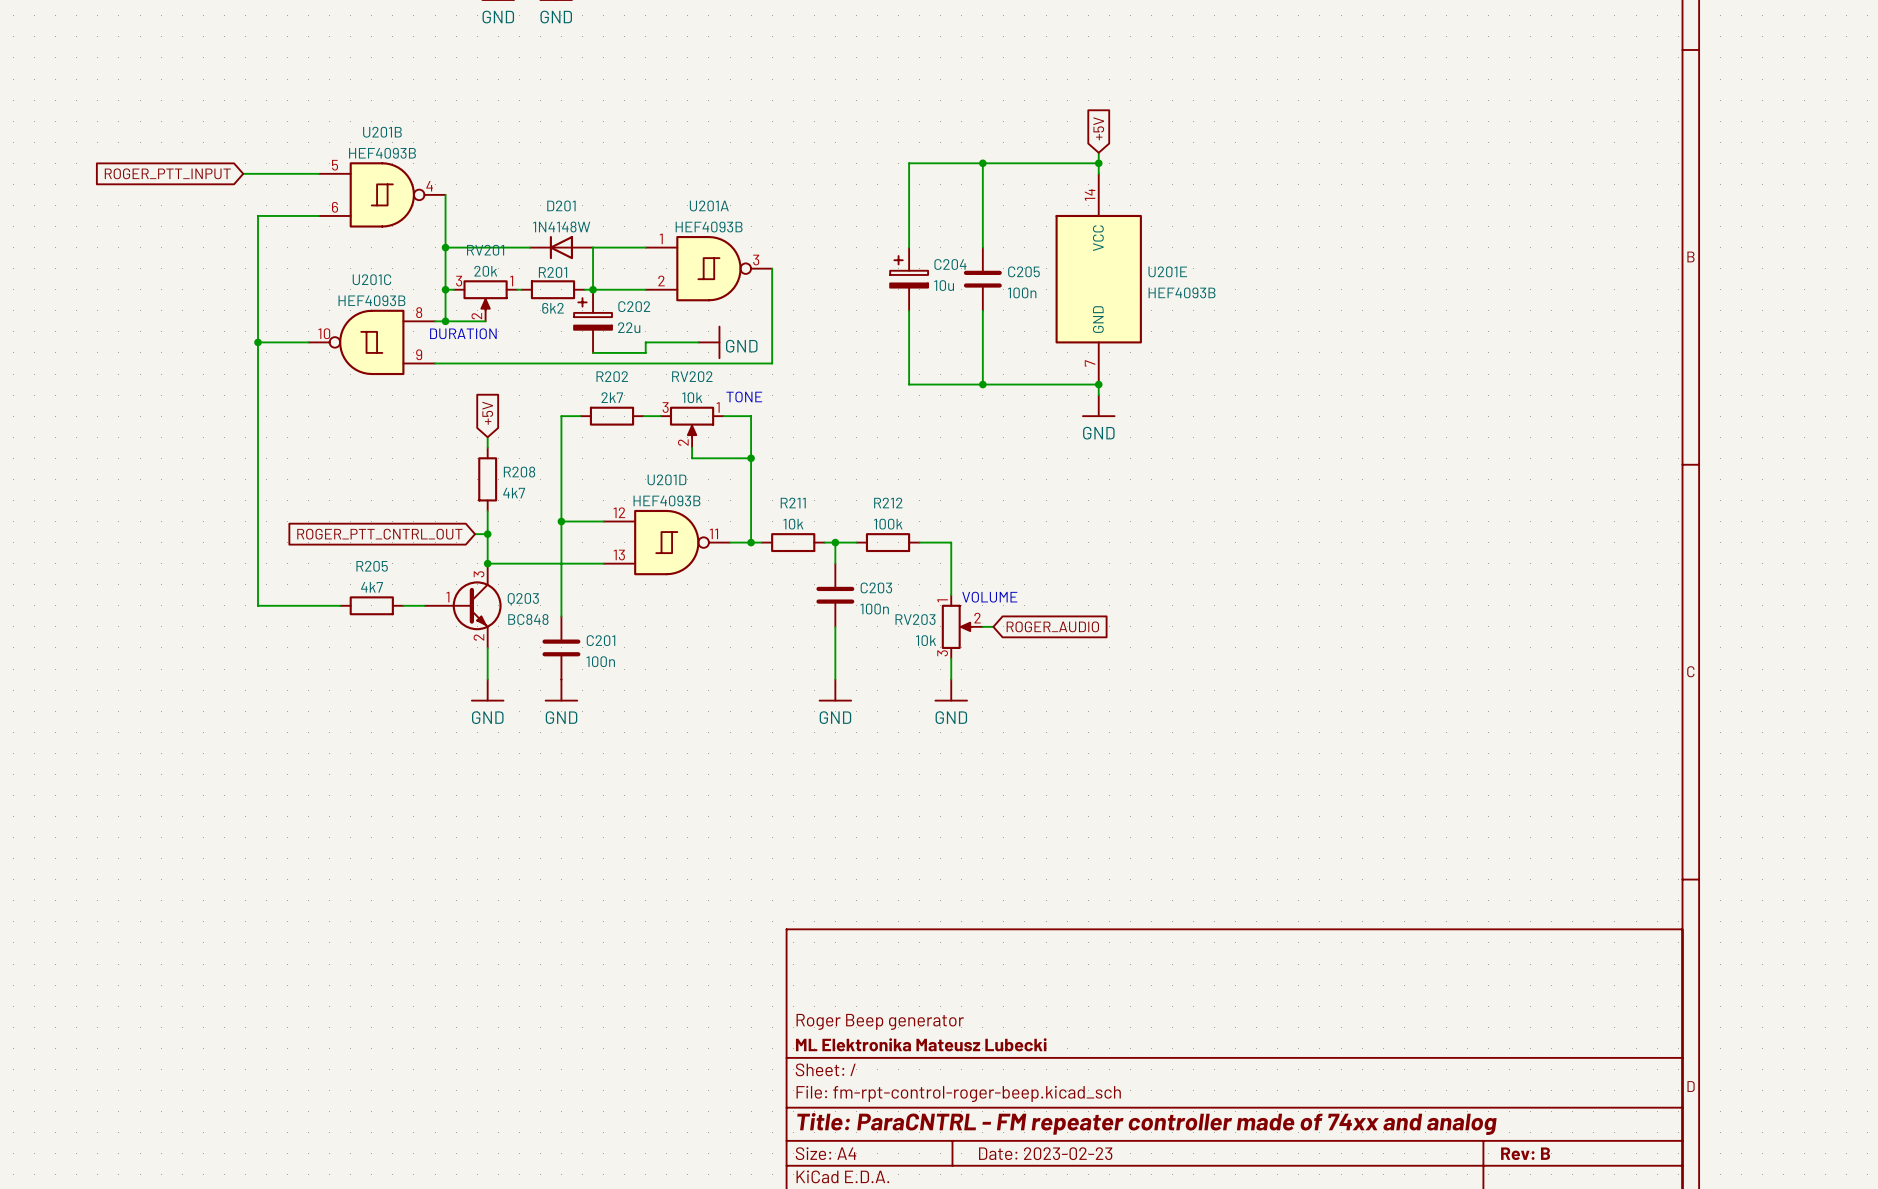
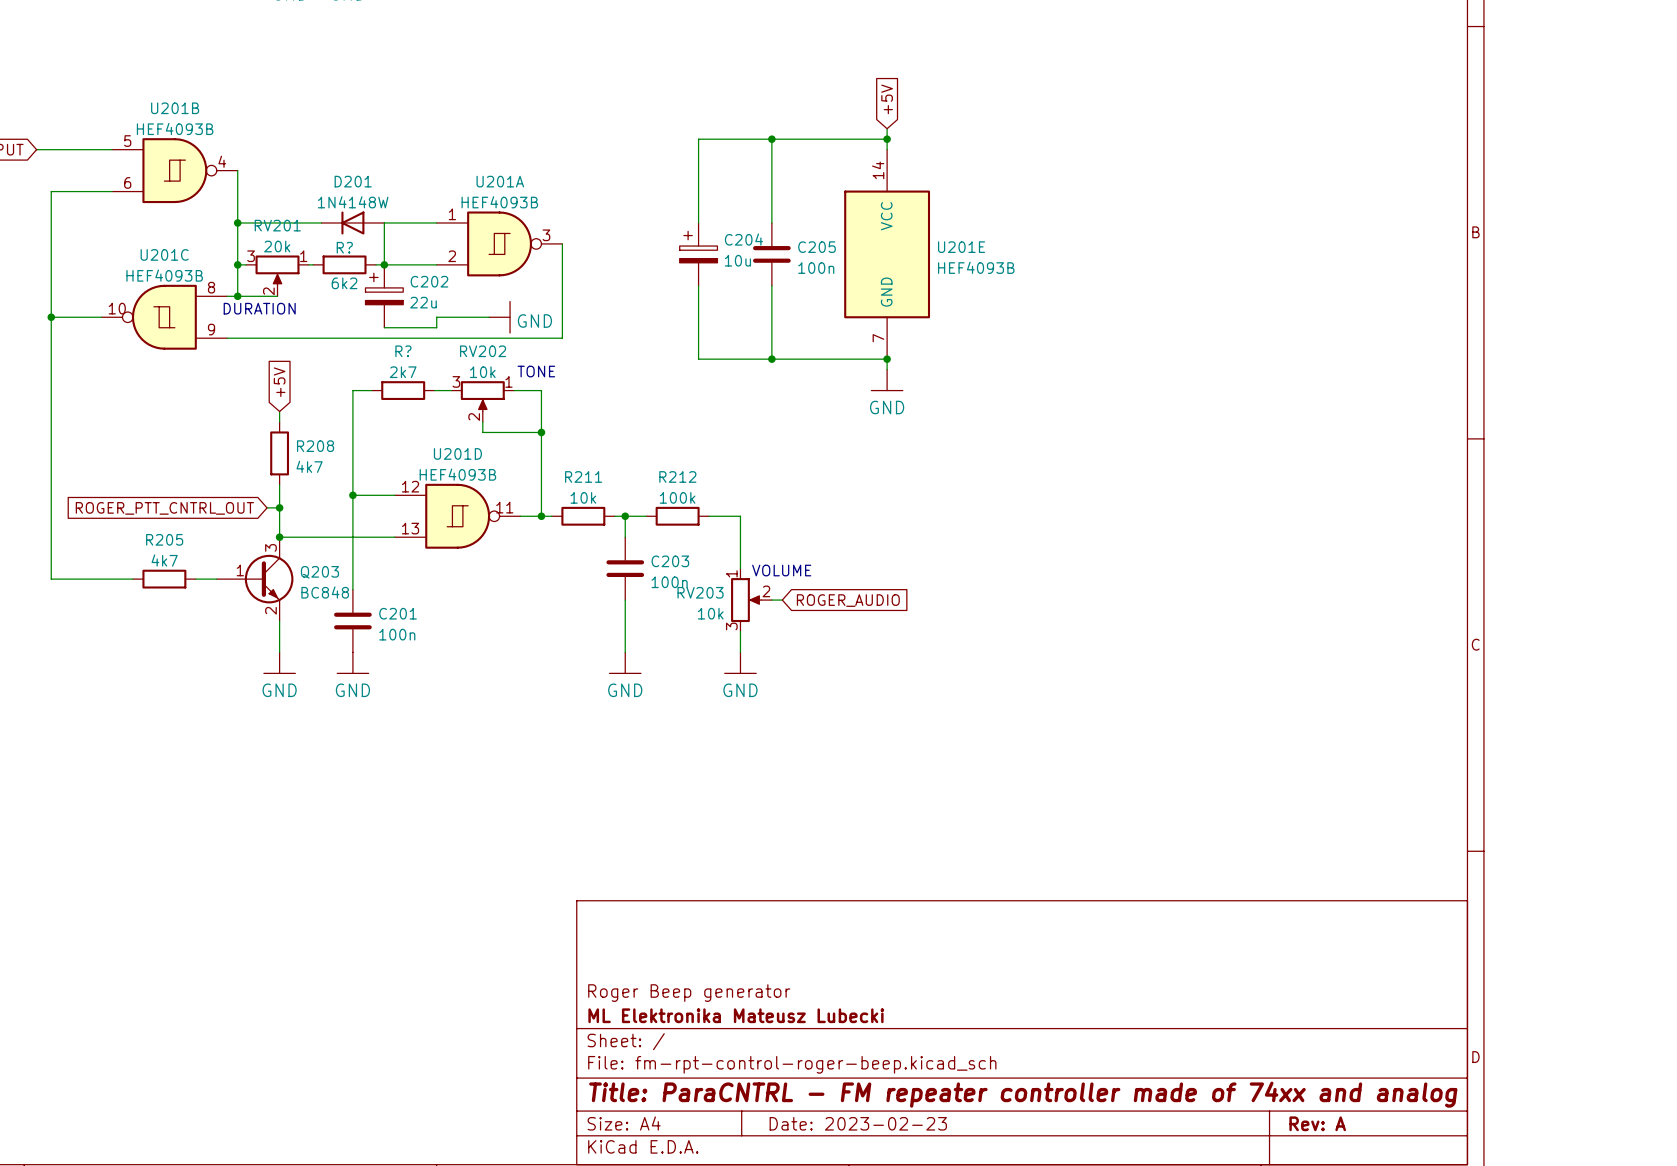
R201 name: R201 (553, 272) -> R? (344, 247)
R202 name: R202 (612, 376) -> R? (403, 351)
title block: Rev: B (1525, 1153) -> Rev: A (1317, 1123)

